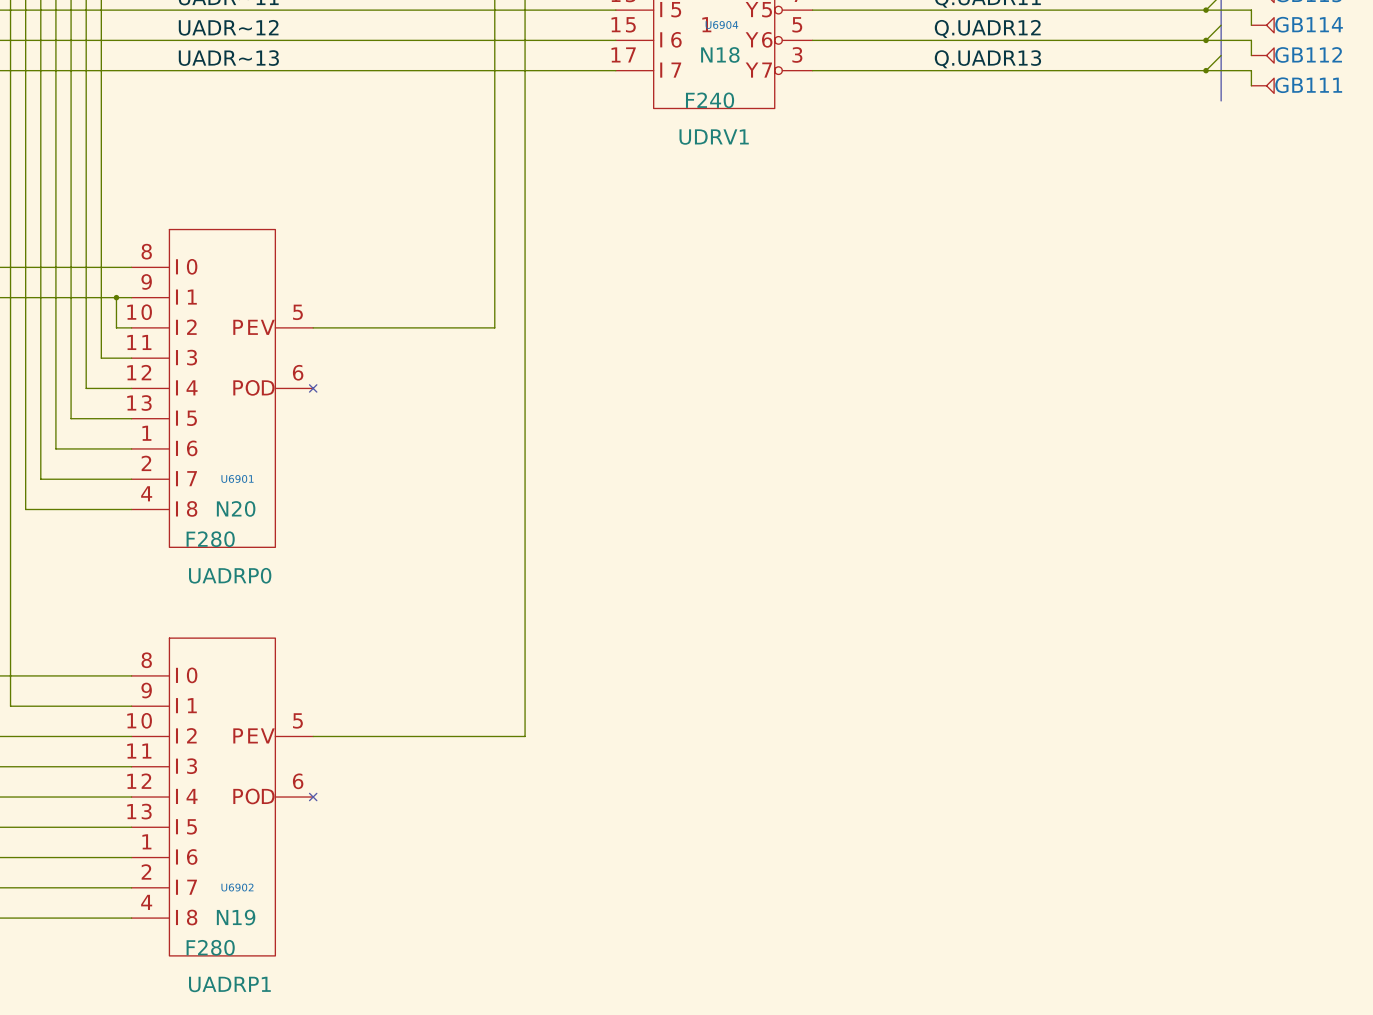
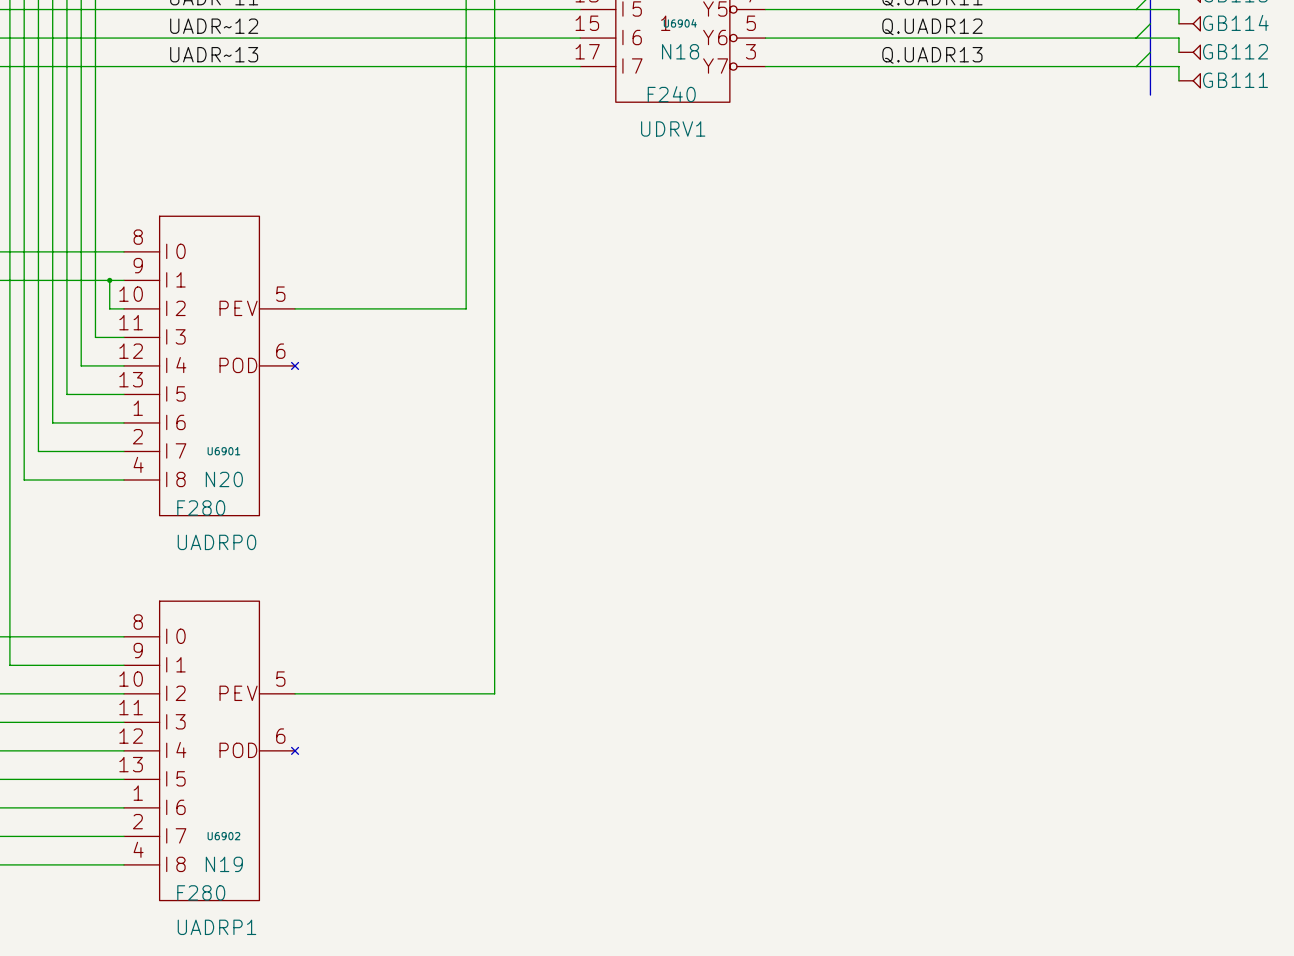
junction: (1206, 10) -> none
junction: (1206, 40) -> none
junction: (1206, 70) -> none

